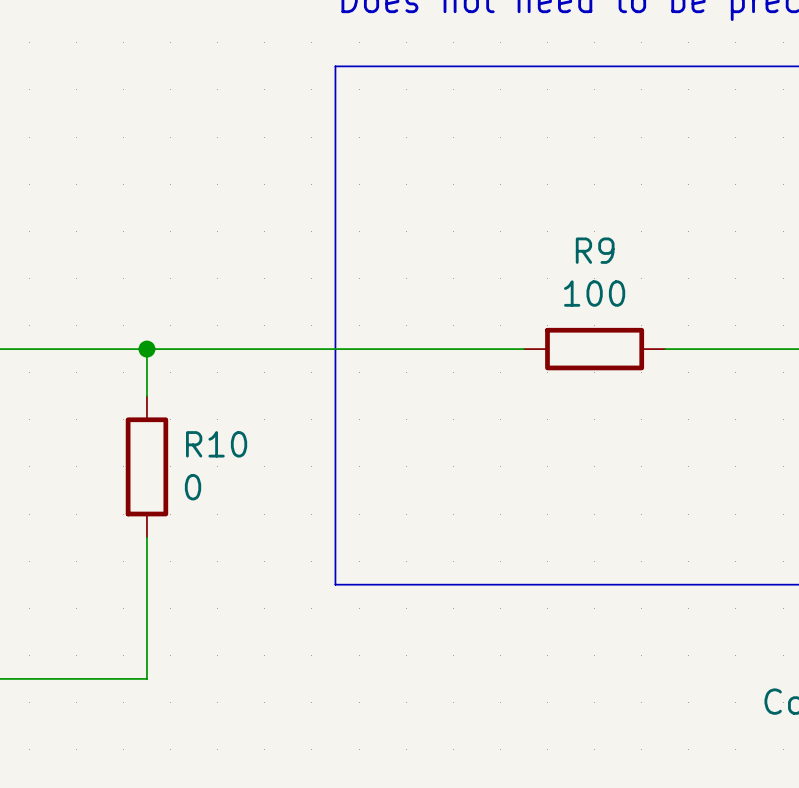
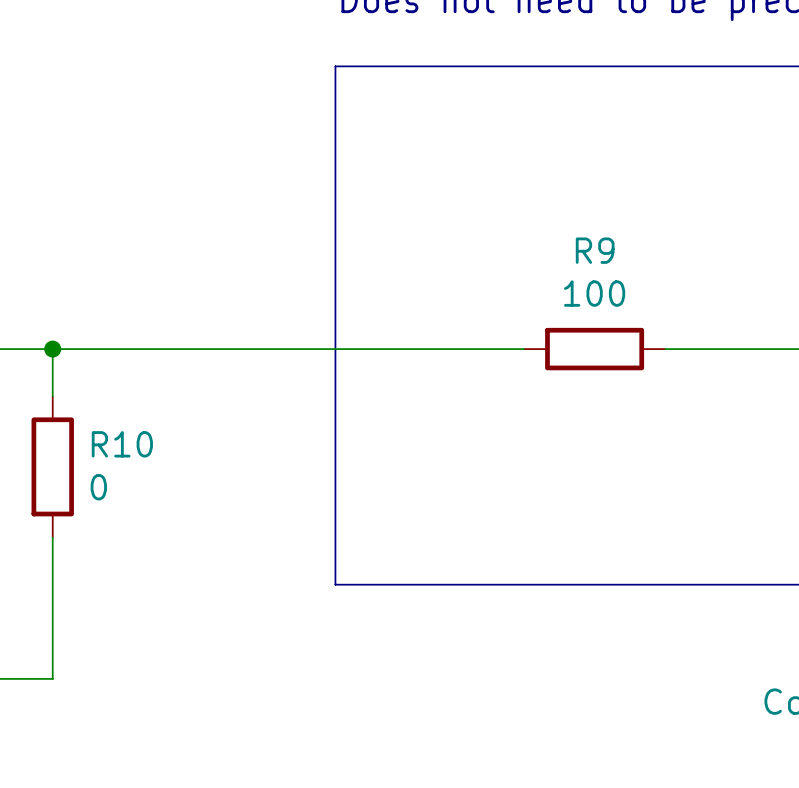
wire: (146, 349) (146, 396) -> (52, 349) (52, 396)
junction position: (146, 349) -> (52, 349)
R10 position: (146, 466) -> (52, 466)
wire: (146, 537) (146, 678) (52, 678) -> (52, 537) (52, 678)

